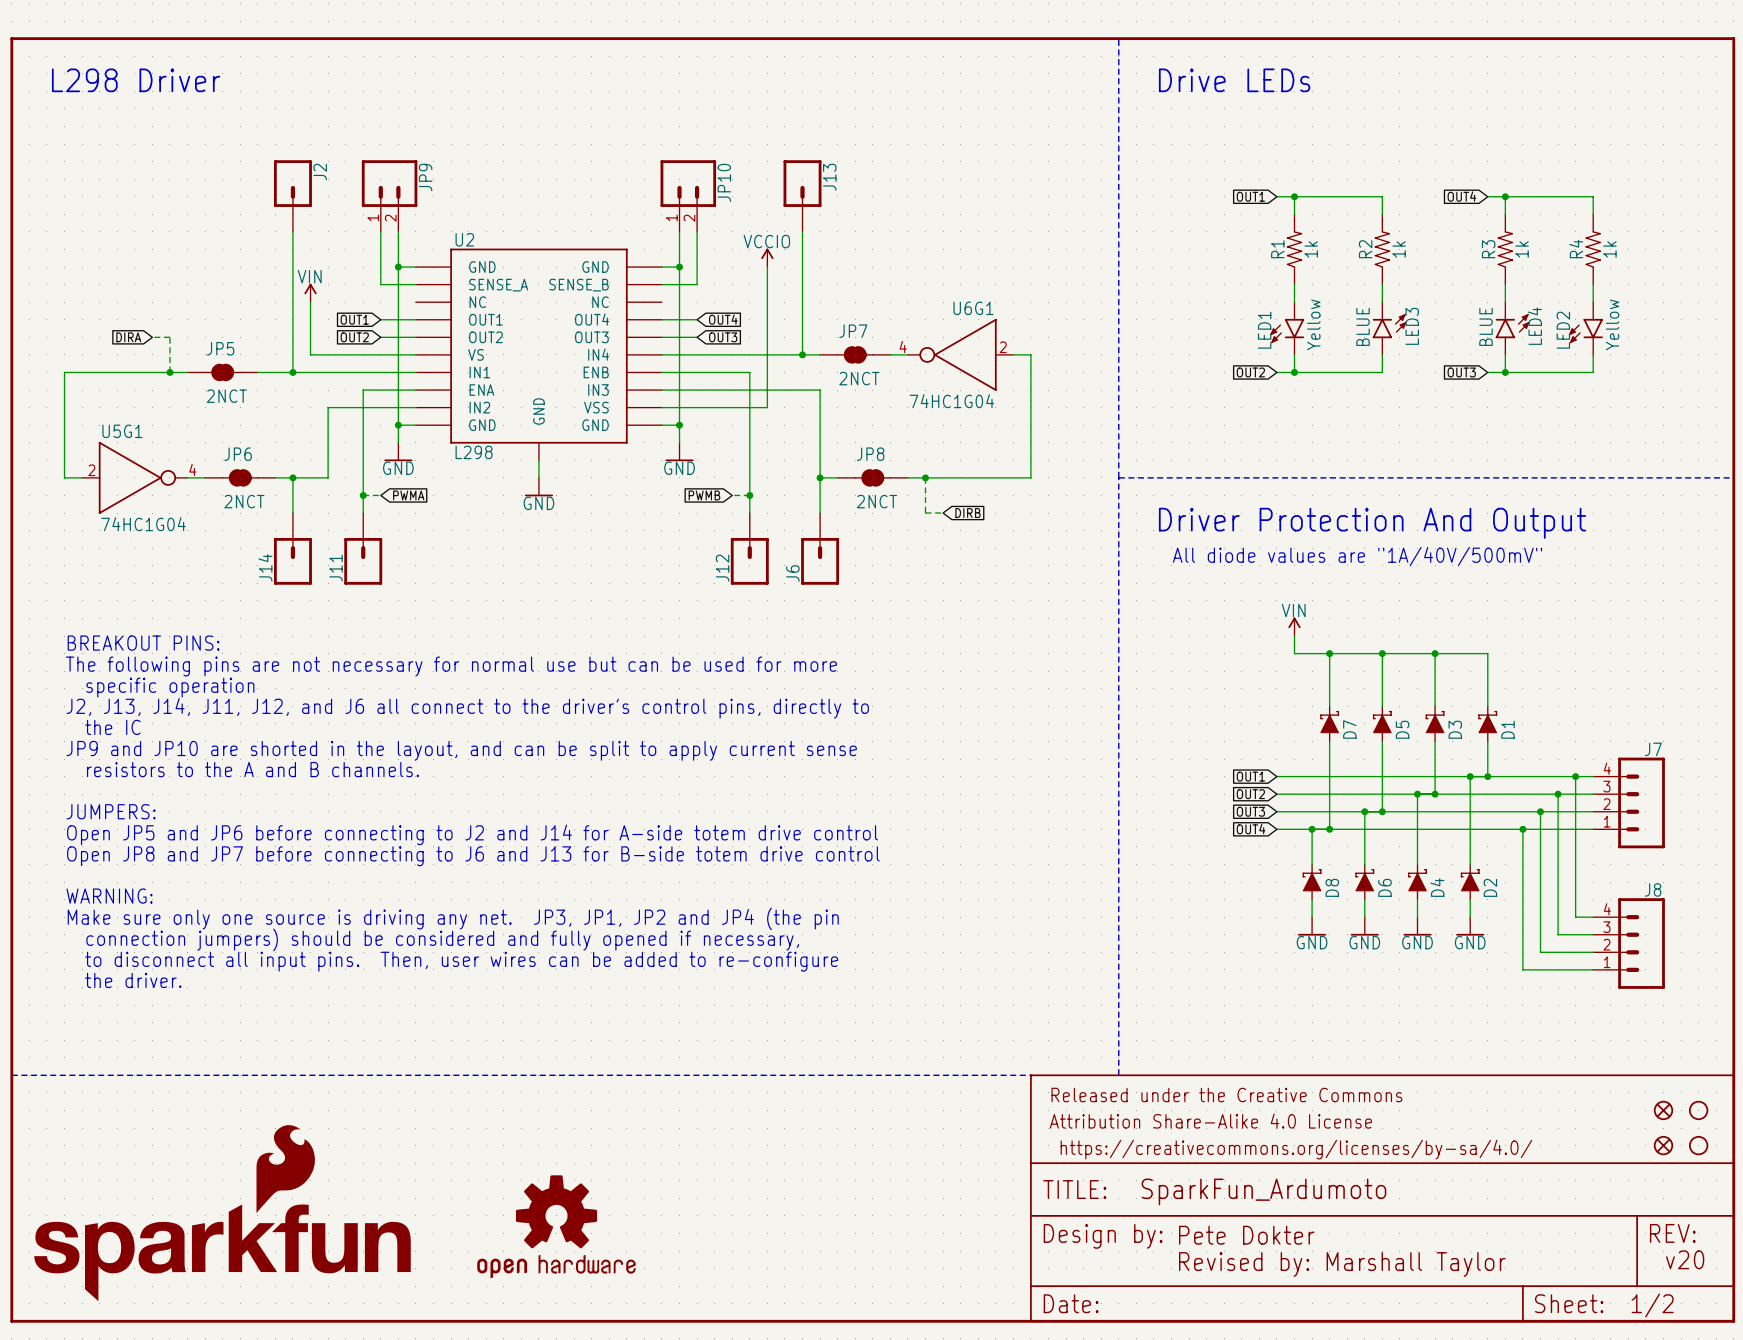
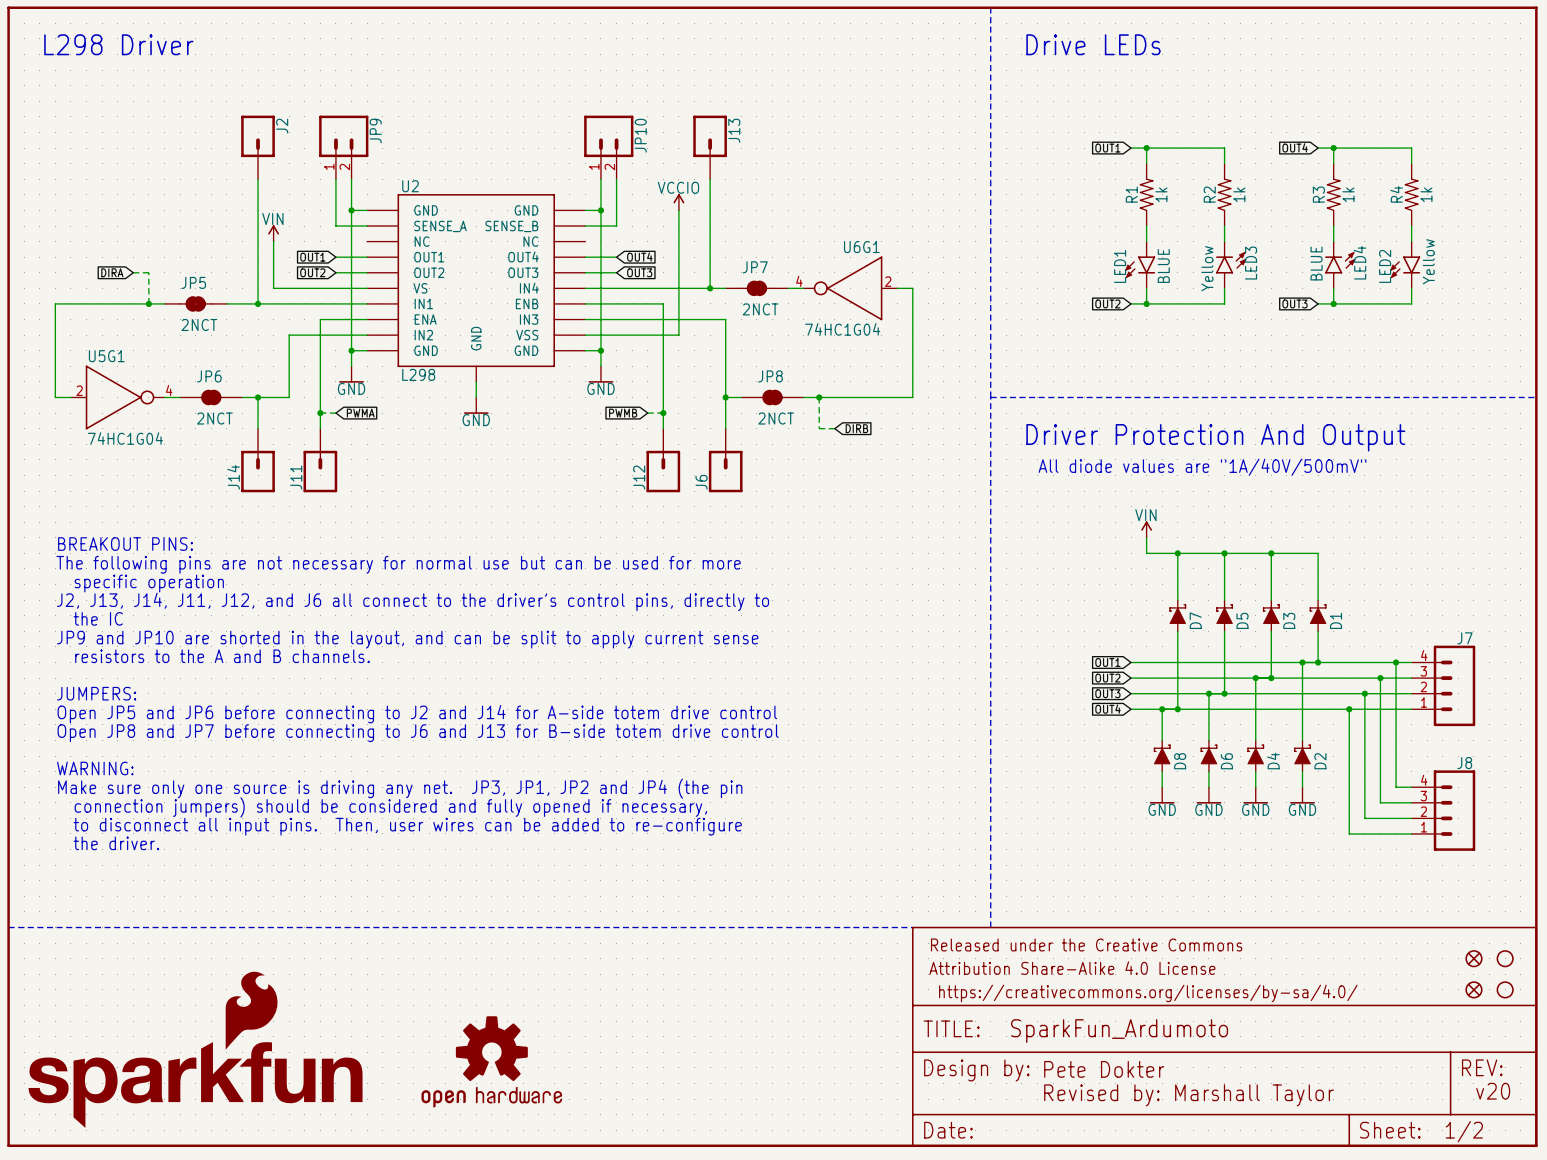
LED1 value: Yellow (1313, 324) -> BLUE (1163, 265)
LED3 value: BLUE (1363, 326) -> Yellow (1207, 268)

